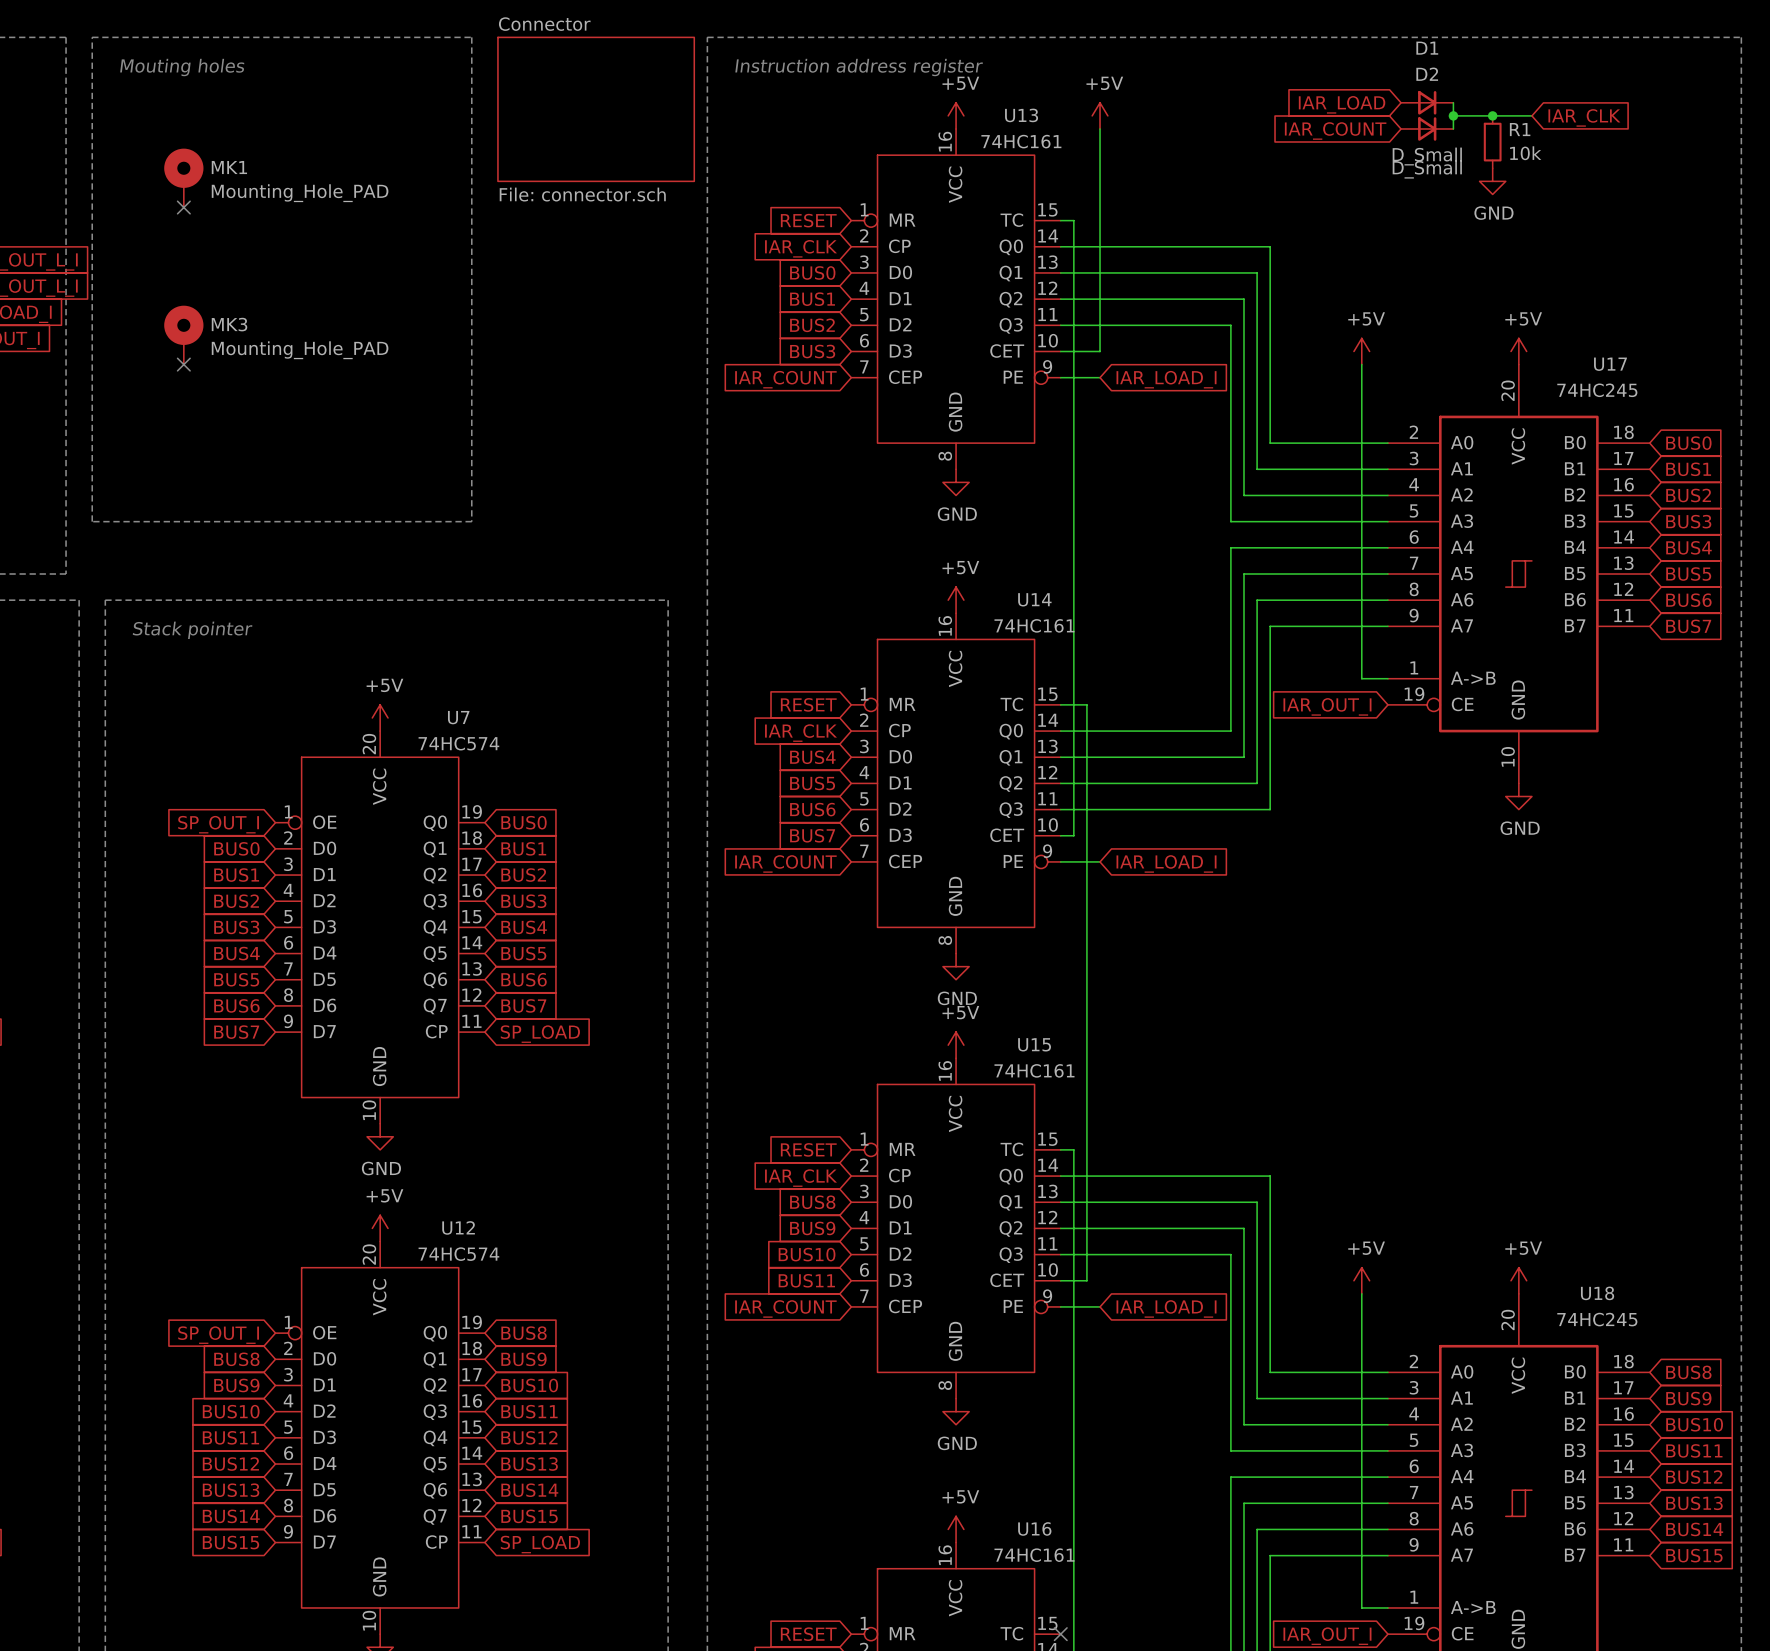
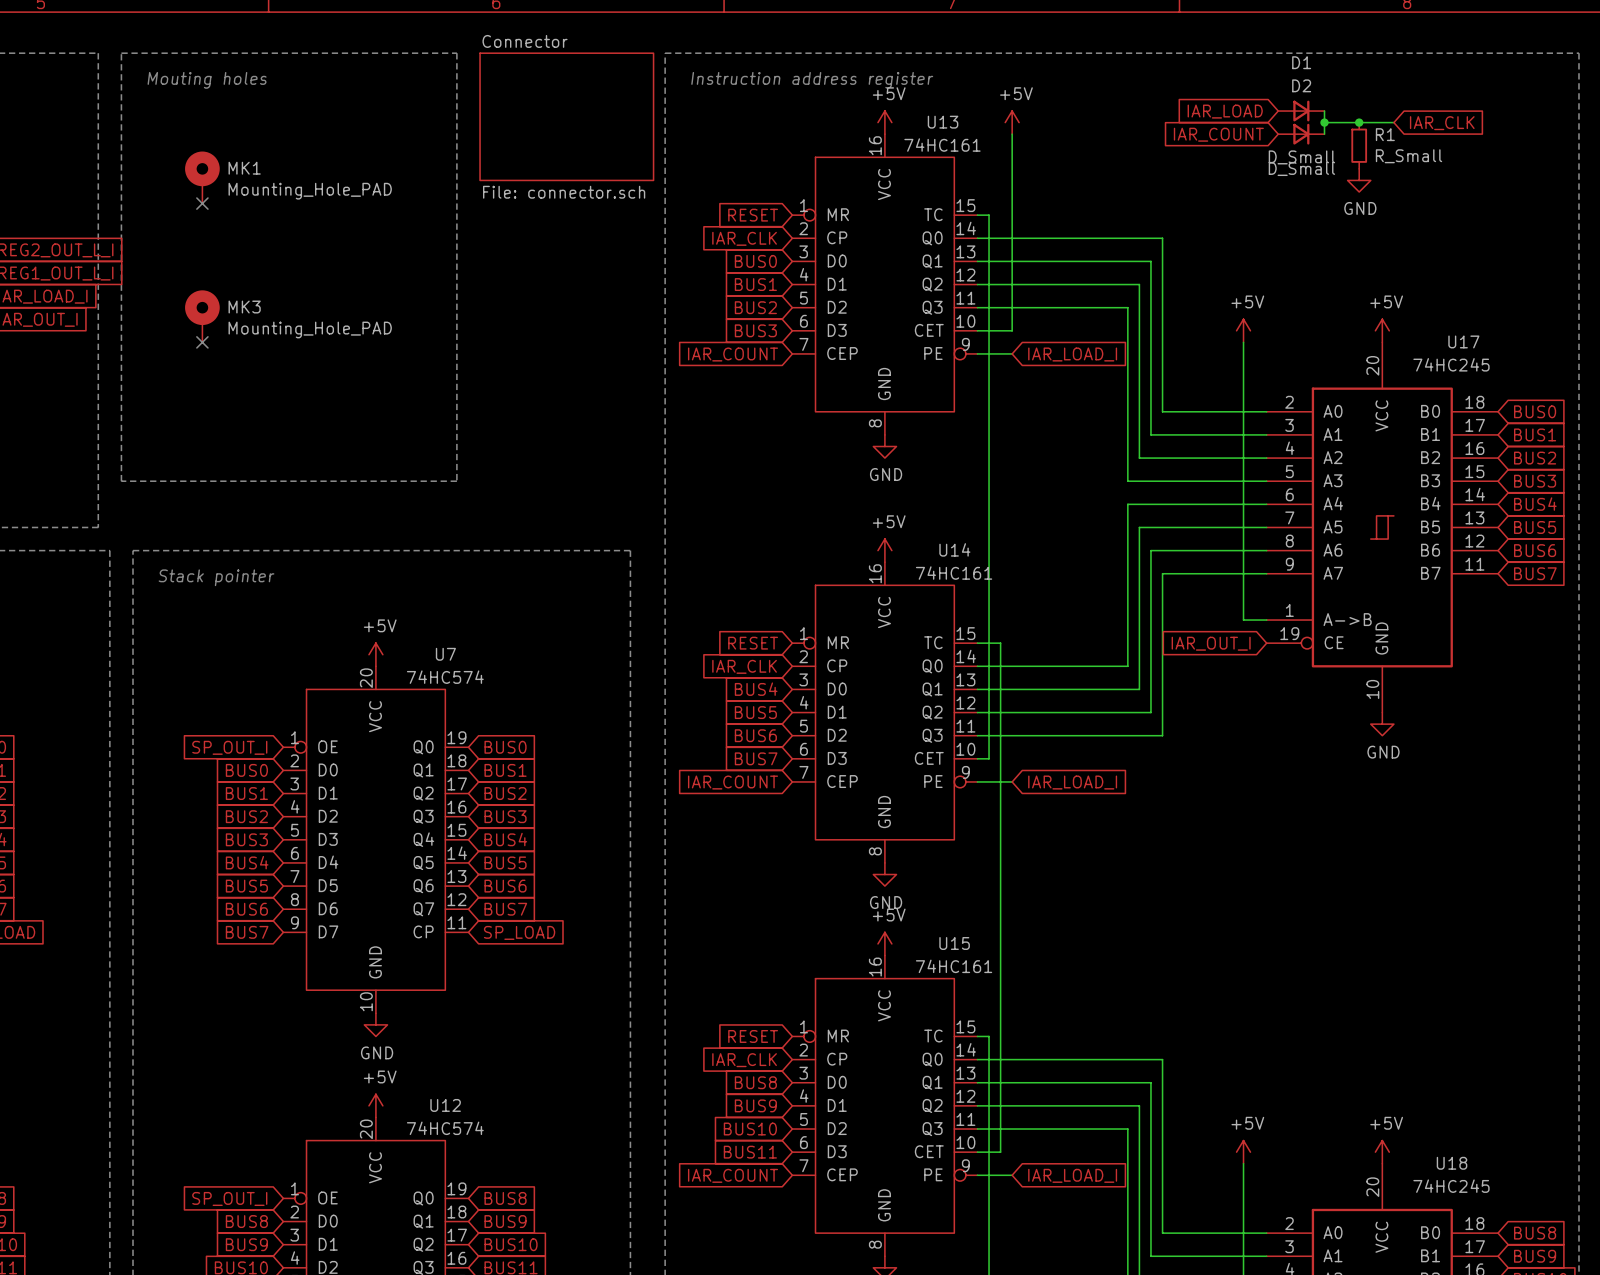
R1 value: 10k (1525, 153) -> R_Small (1409, 156)

